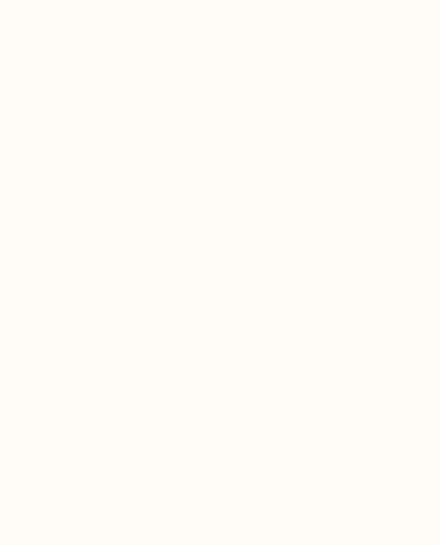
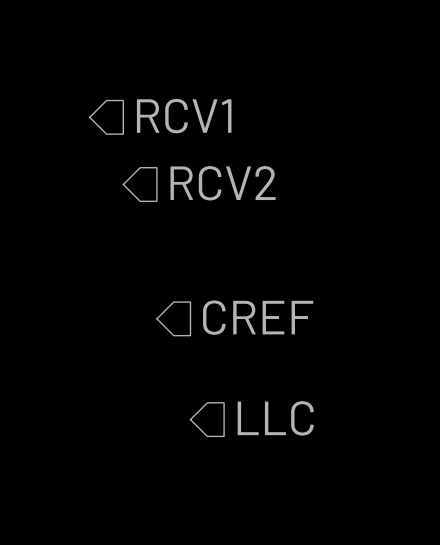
hierarchical label: none -> RCV1 (184, 116)
hierarchical label: none -> RCV2 (223, 183)
hierarchical label: none -> CREF (258, 317)
hierarchical label: none -> LLC (275, 418)

